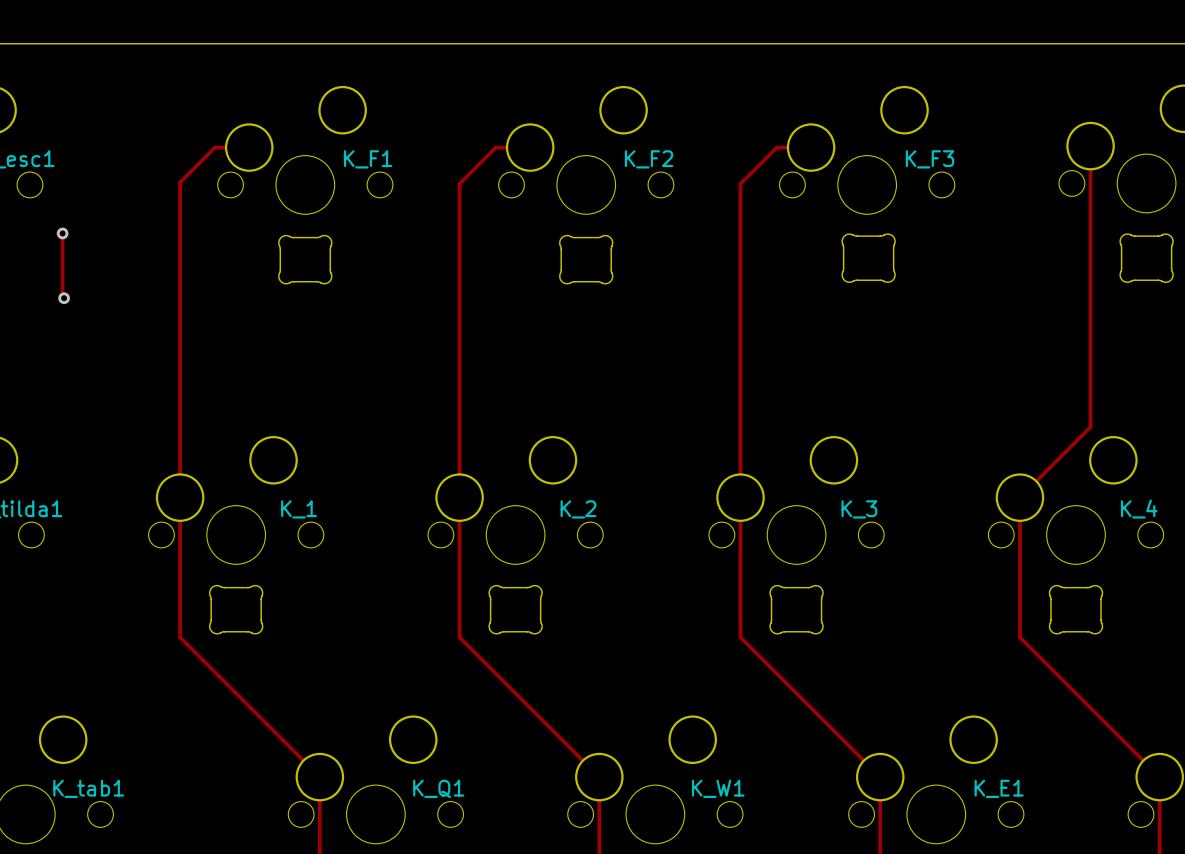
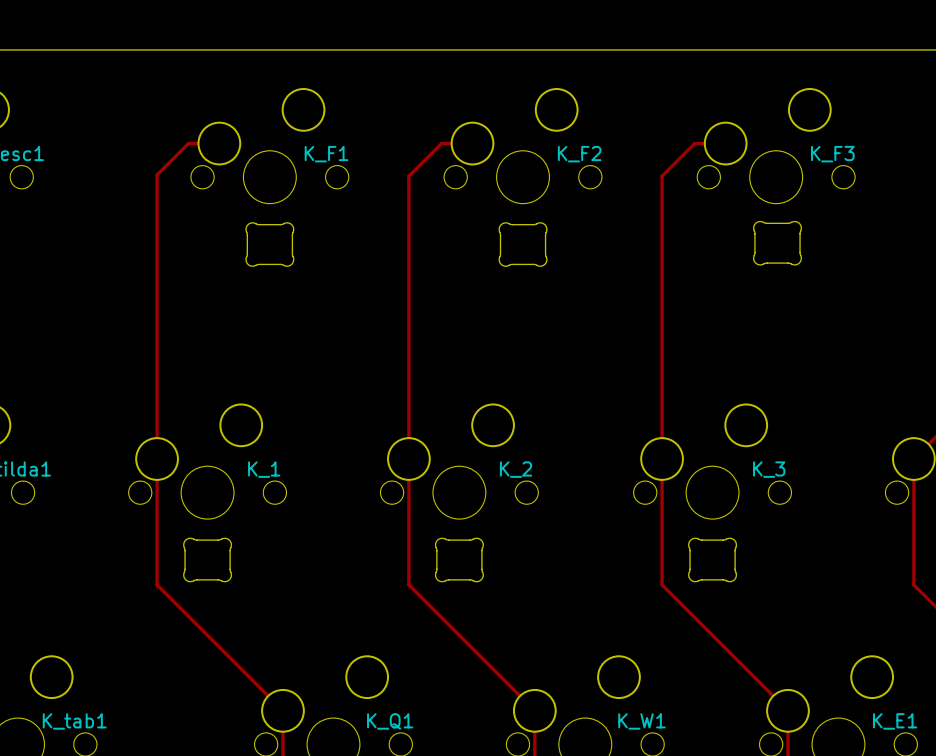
track: (62, 233) (64, 298) -> none
via: (62, 233) -> none
via: (64, 298) -> none

